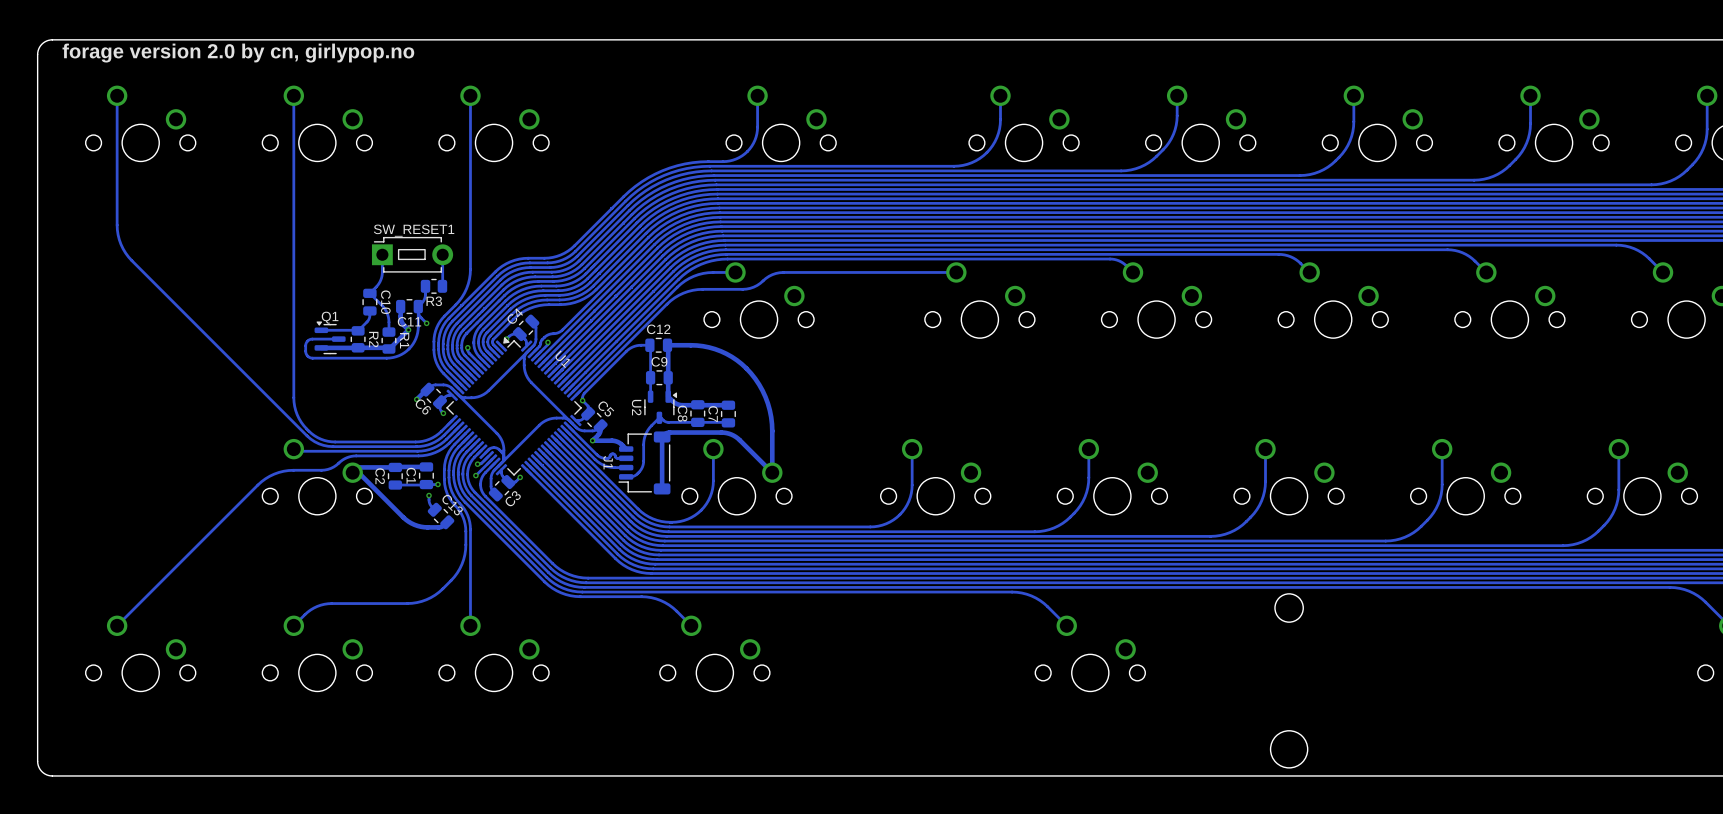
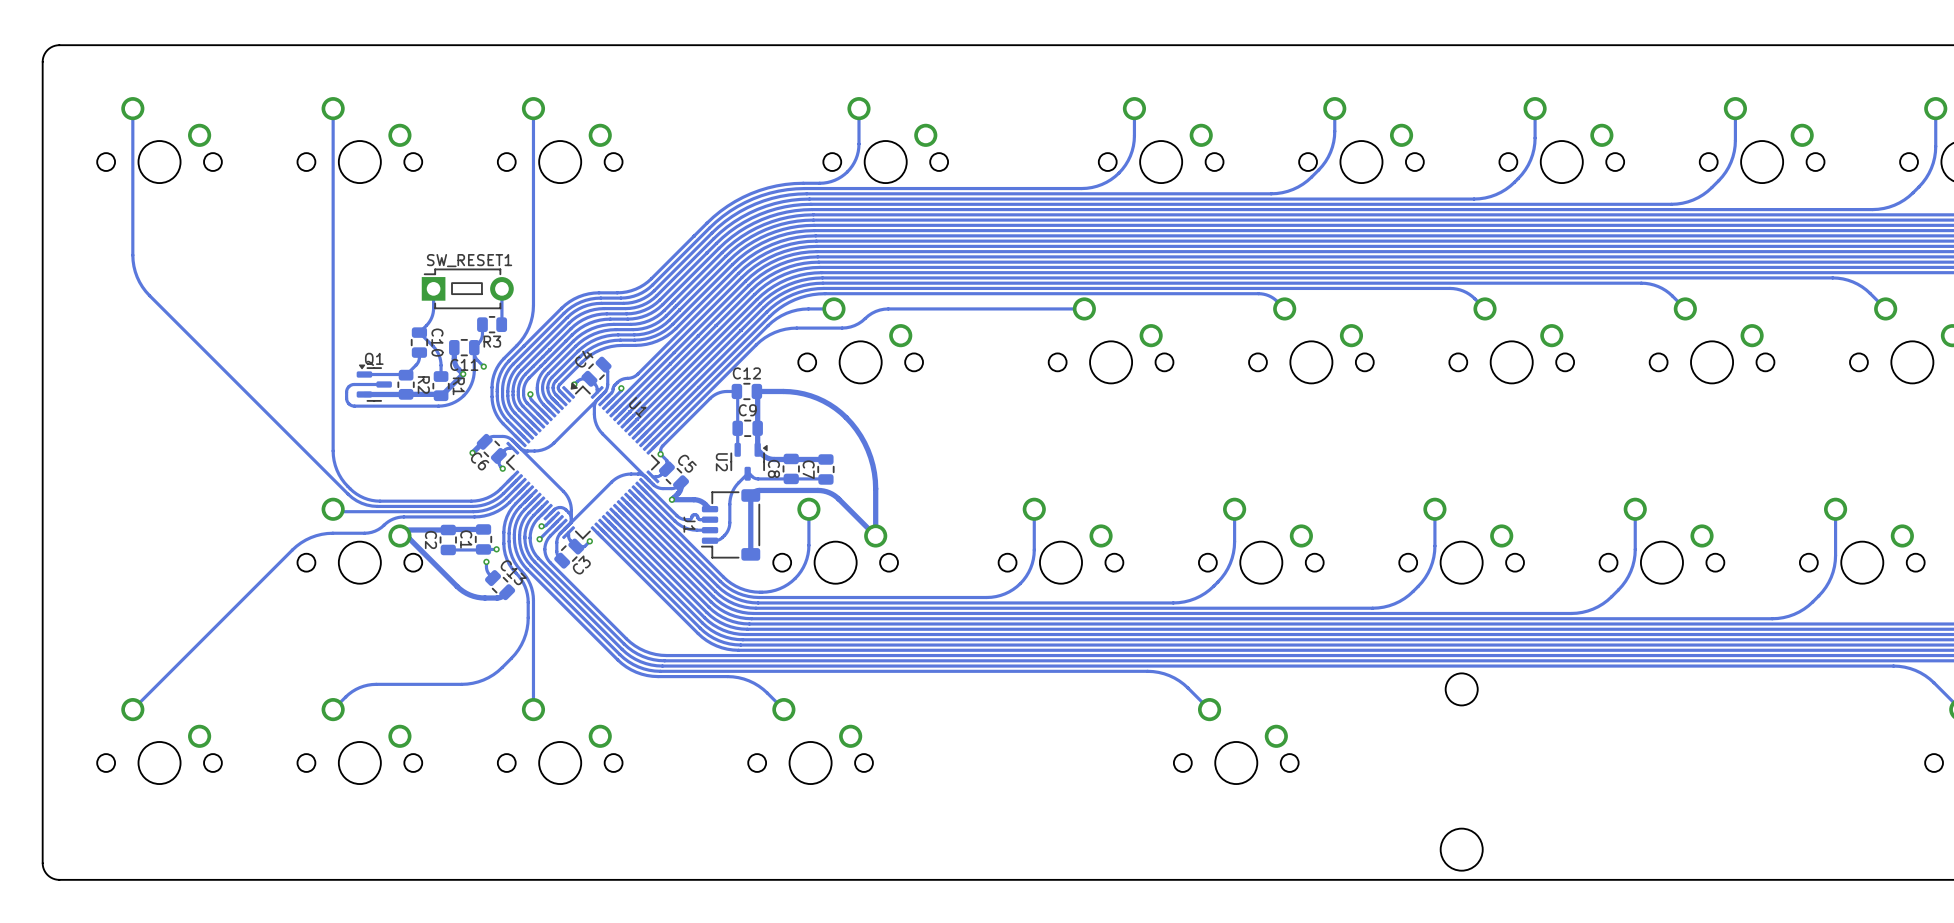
text: forage version 2.0 by cn, girlypop.no (238, 53) -> none

